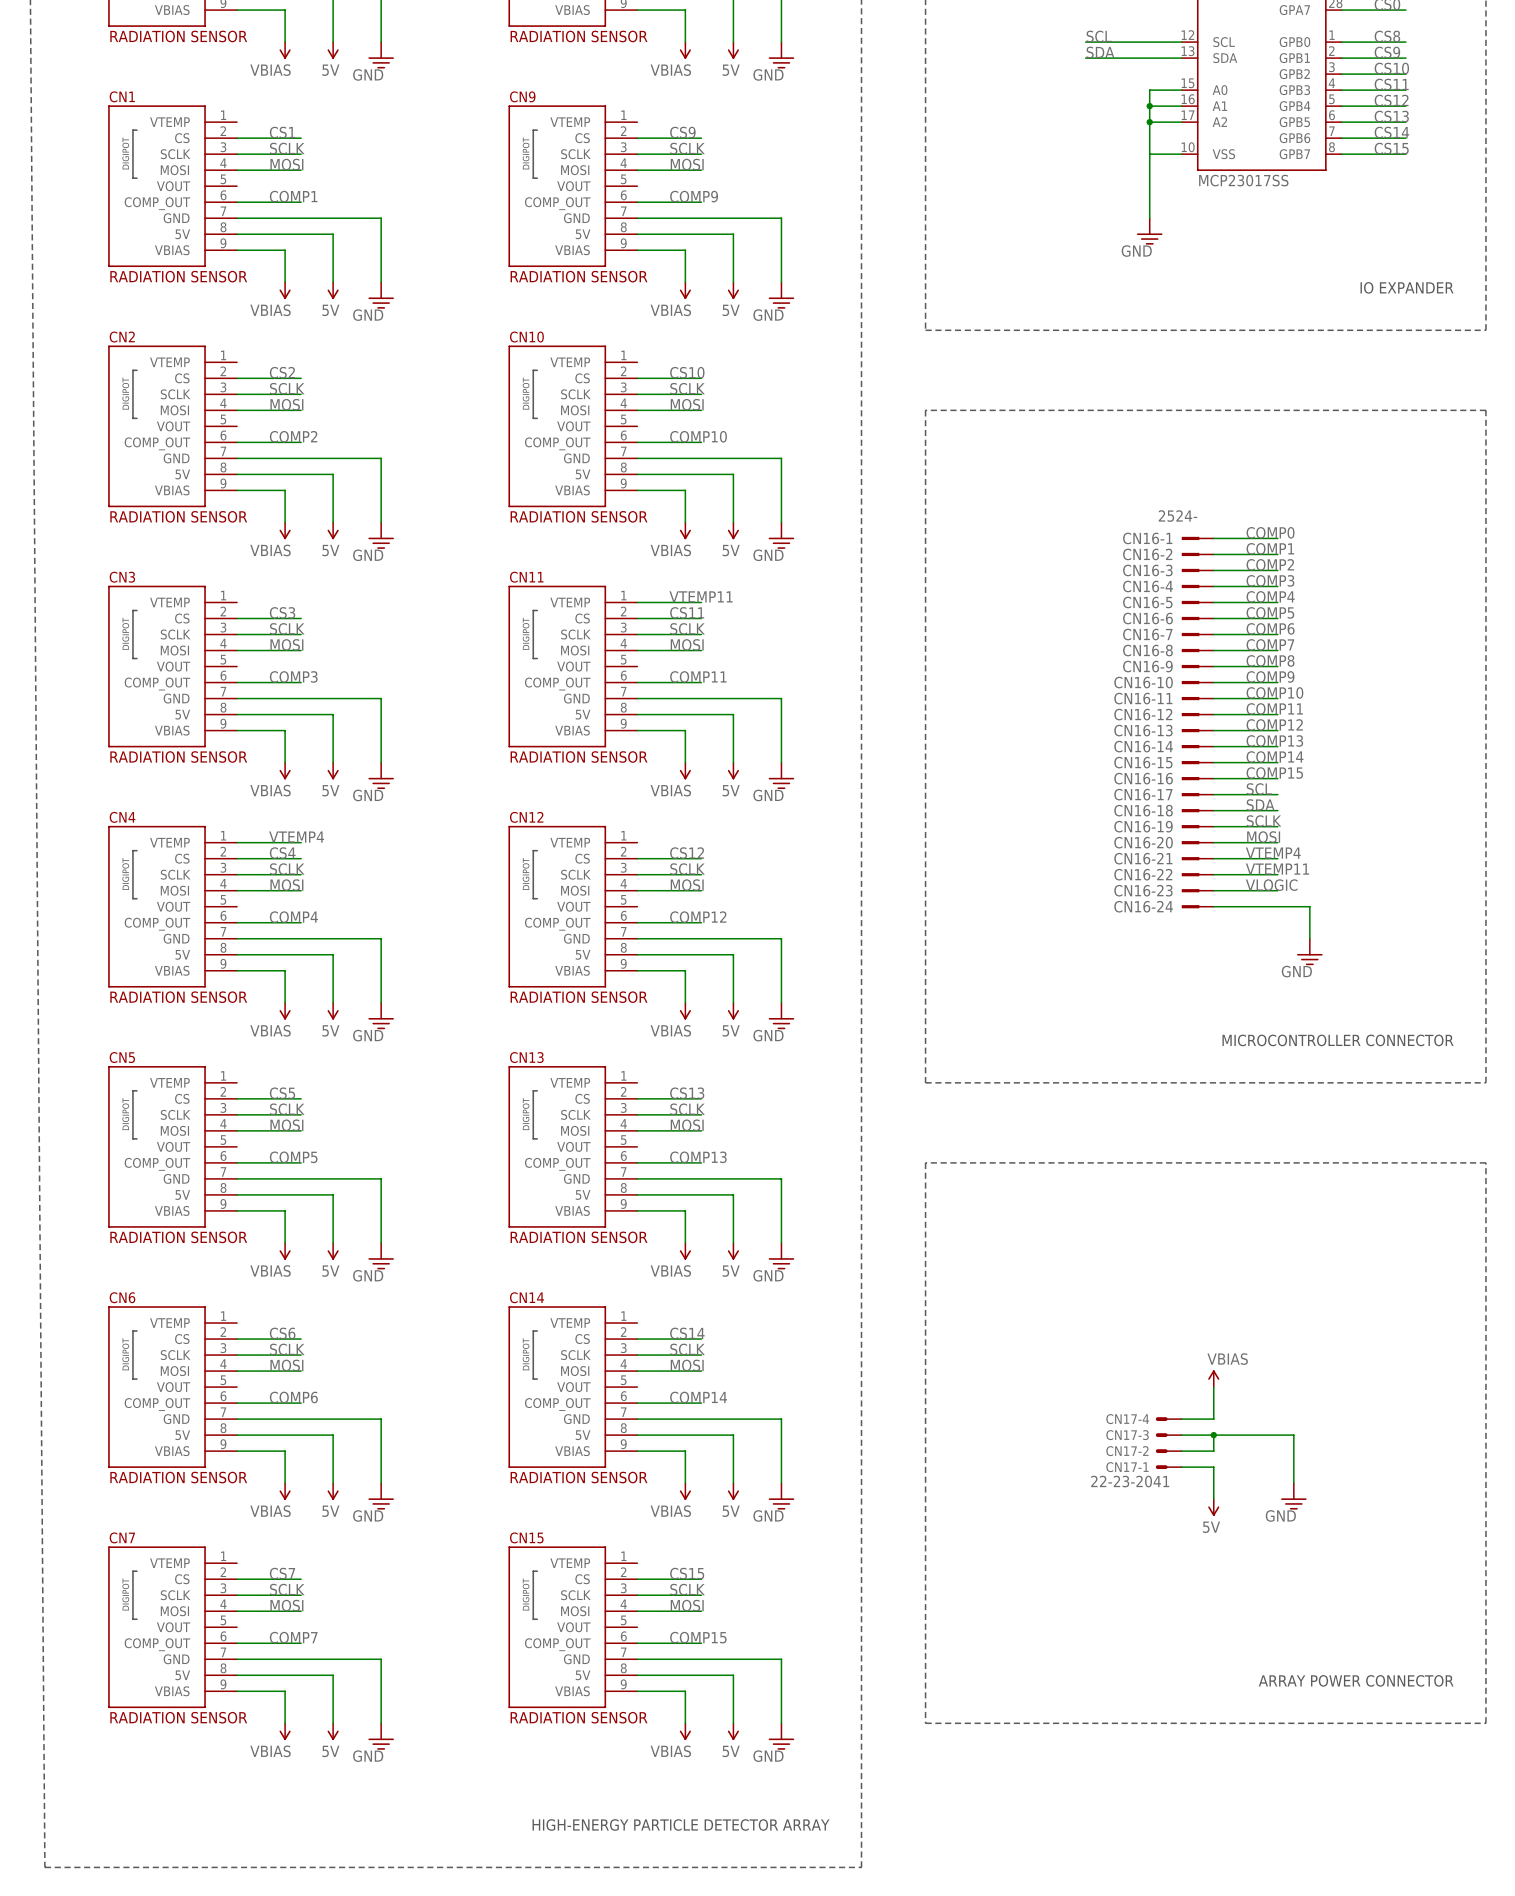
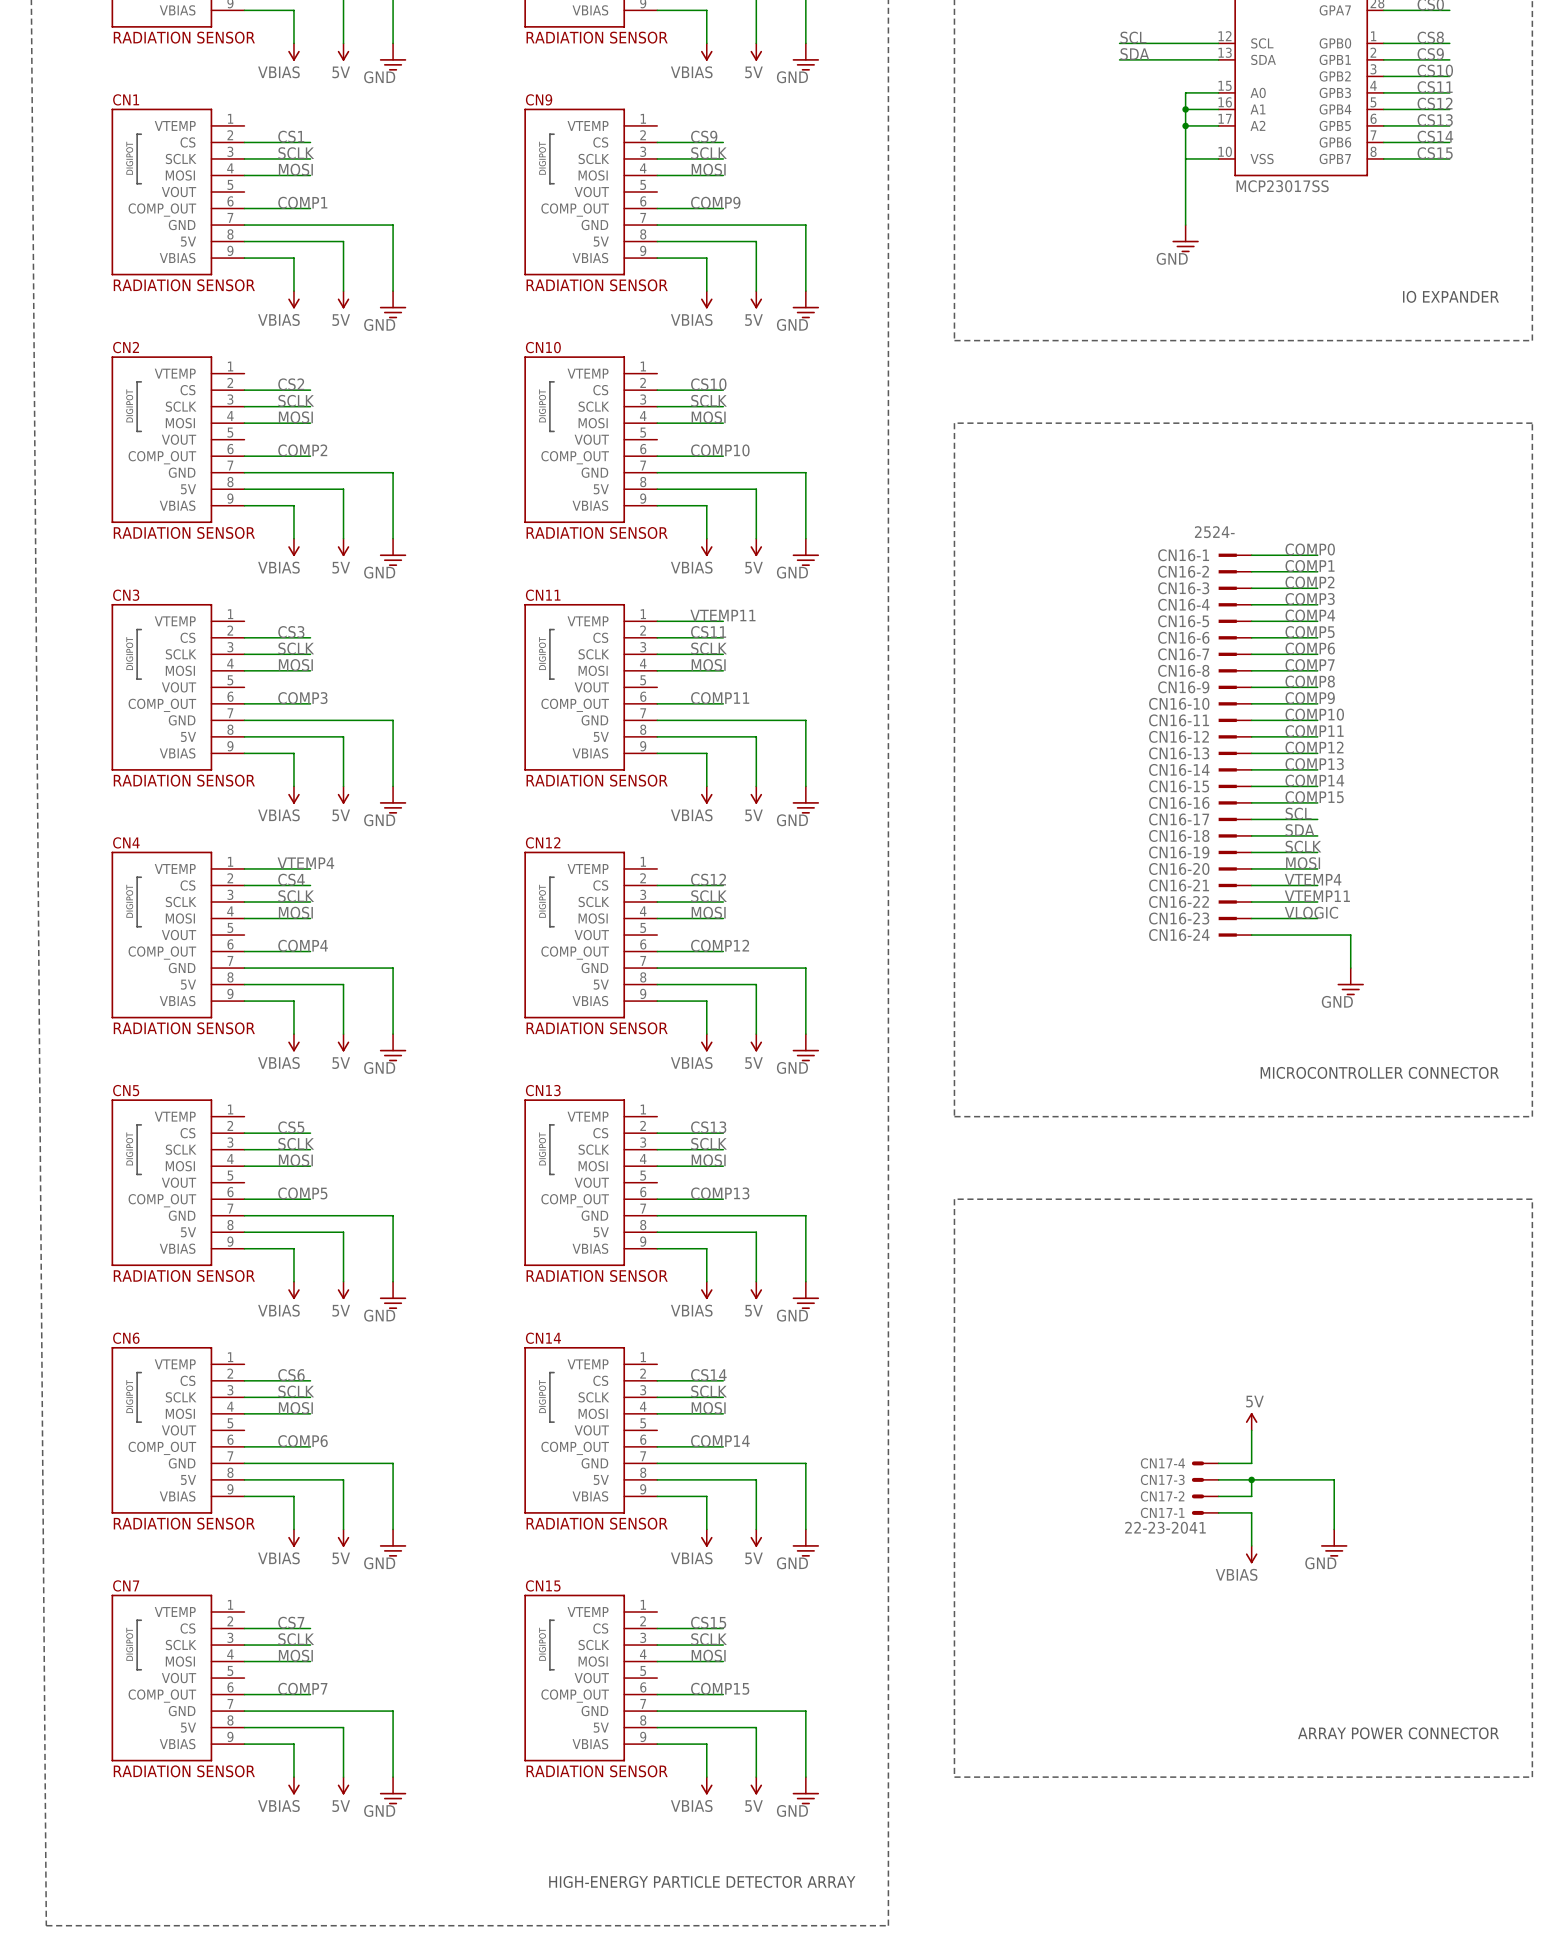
power symbol: VBIAS (1213, 1378) -> 5V (1251, 1421)
power symbol: 5V (1213, 1507) -> VBIAS (1251, 1554)

